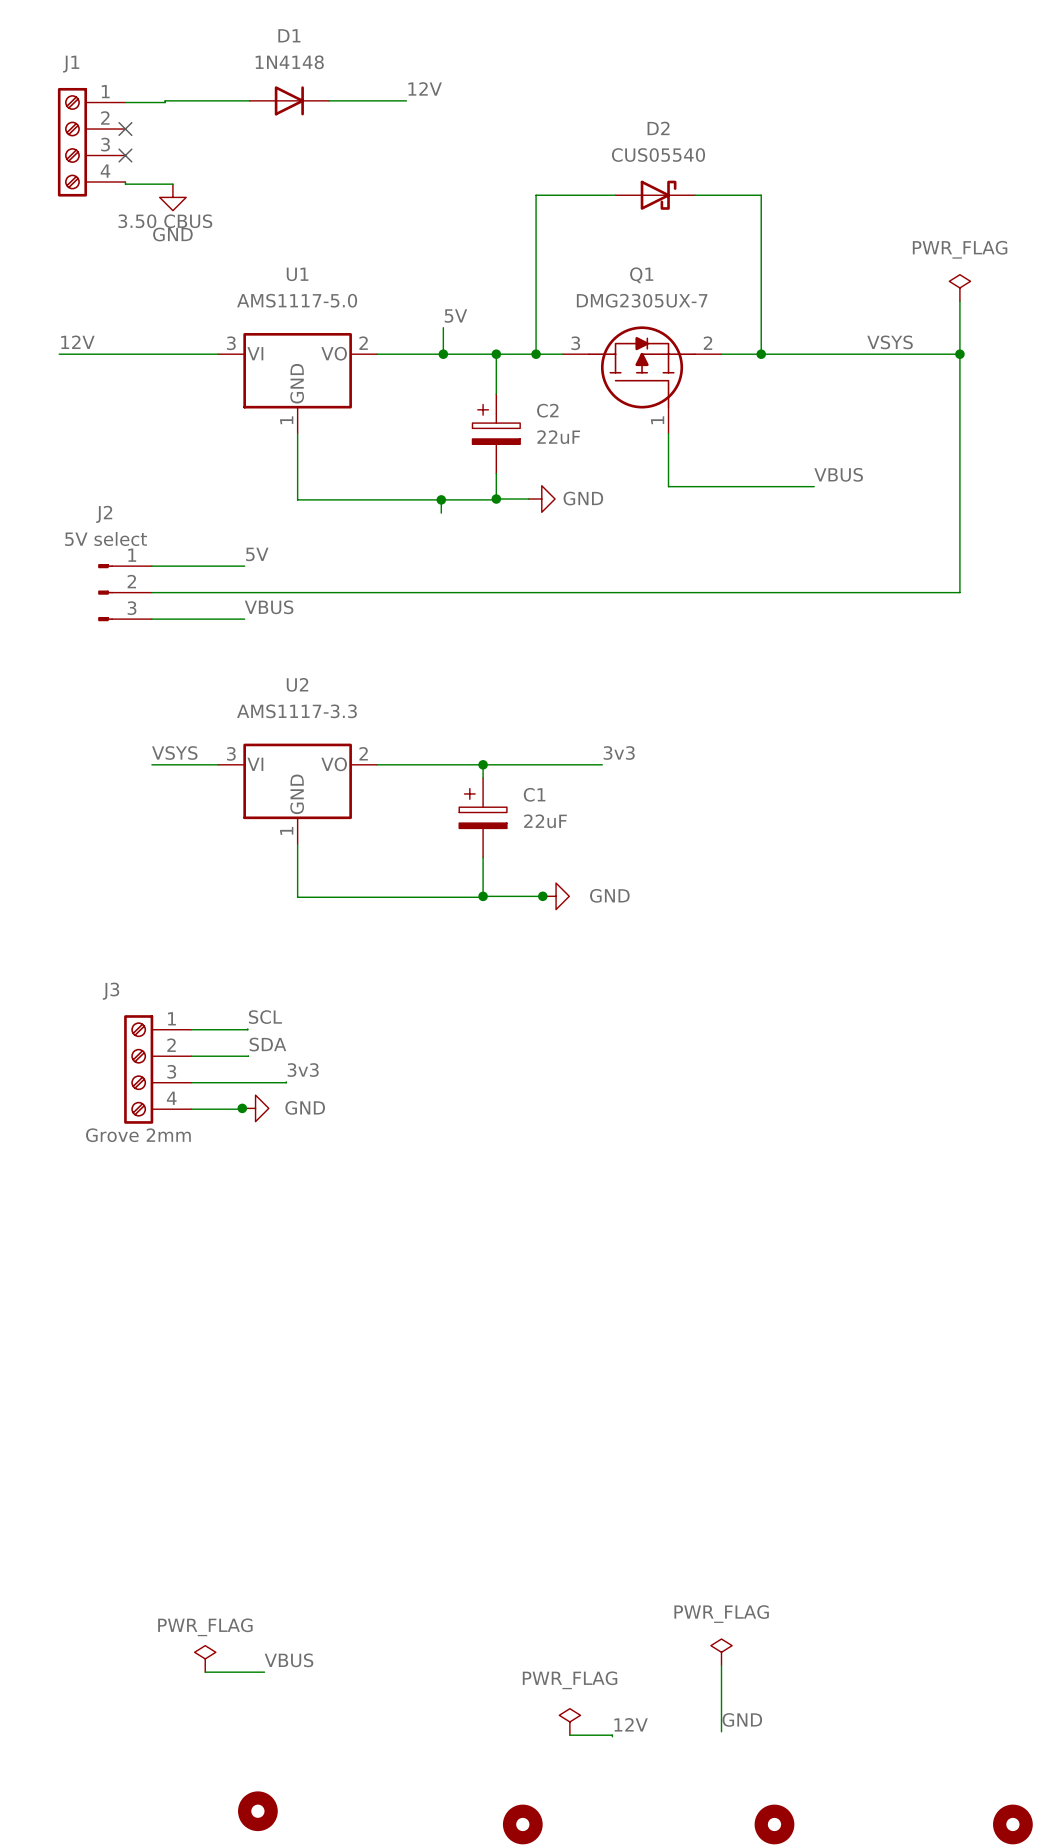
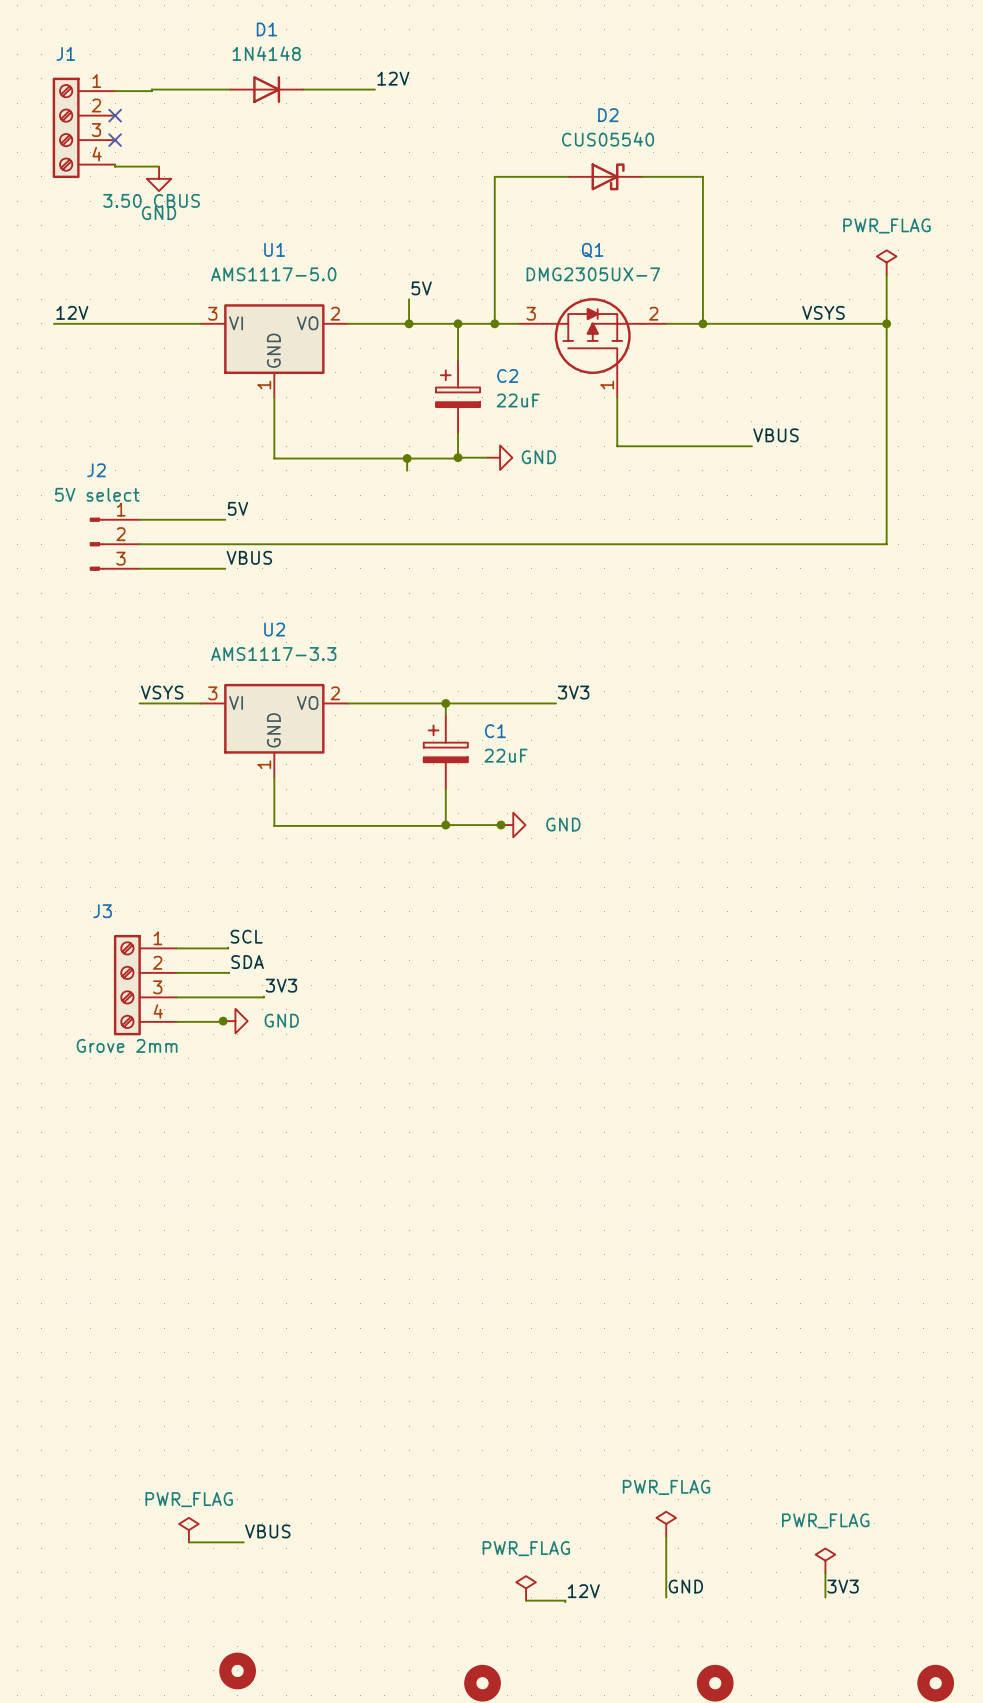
label: 3v3 (619, 753) -> 3V3 (573, 692)
label: 3v3 (303, 1070) -> 3V3 (281, 985)
power symbol: none -> PWR_FLAG (825, 1560)
wire: none -> (825, 1572) (825, 1597)
label: none -> 3V3 (843, 1586)

